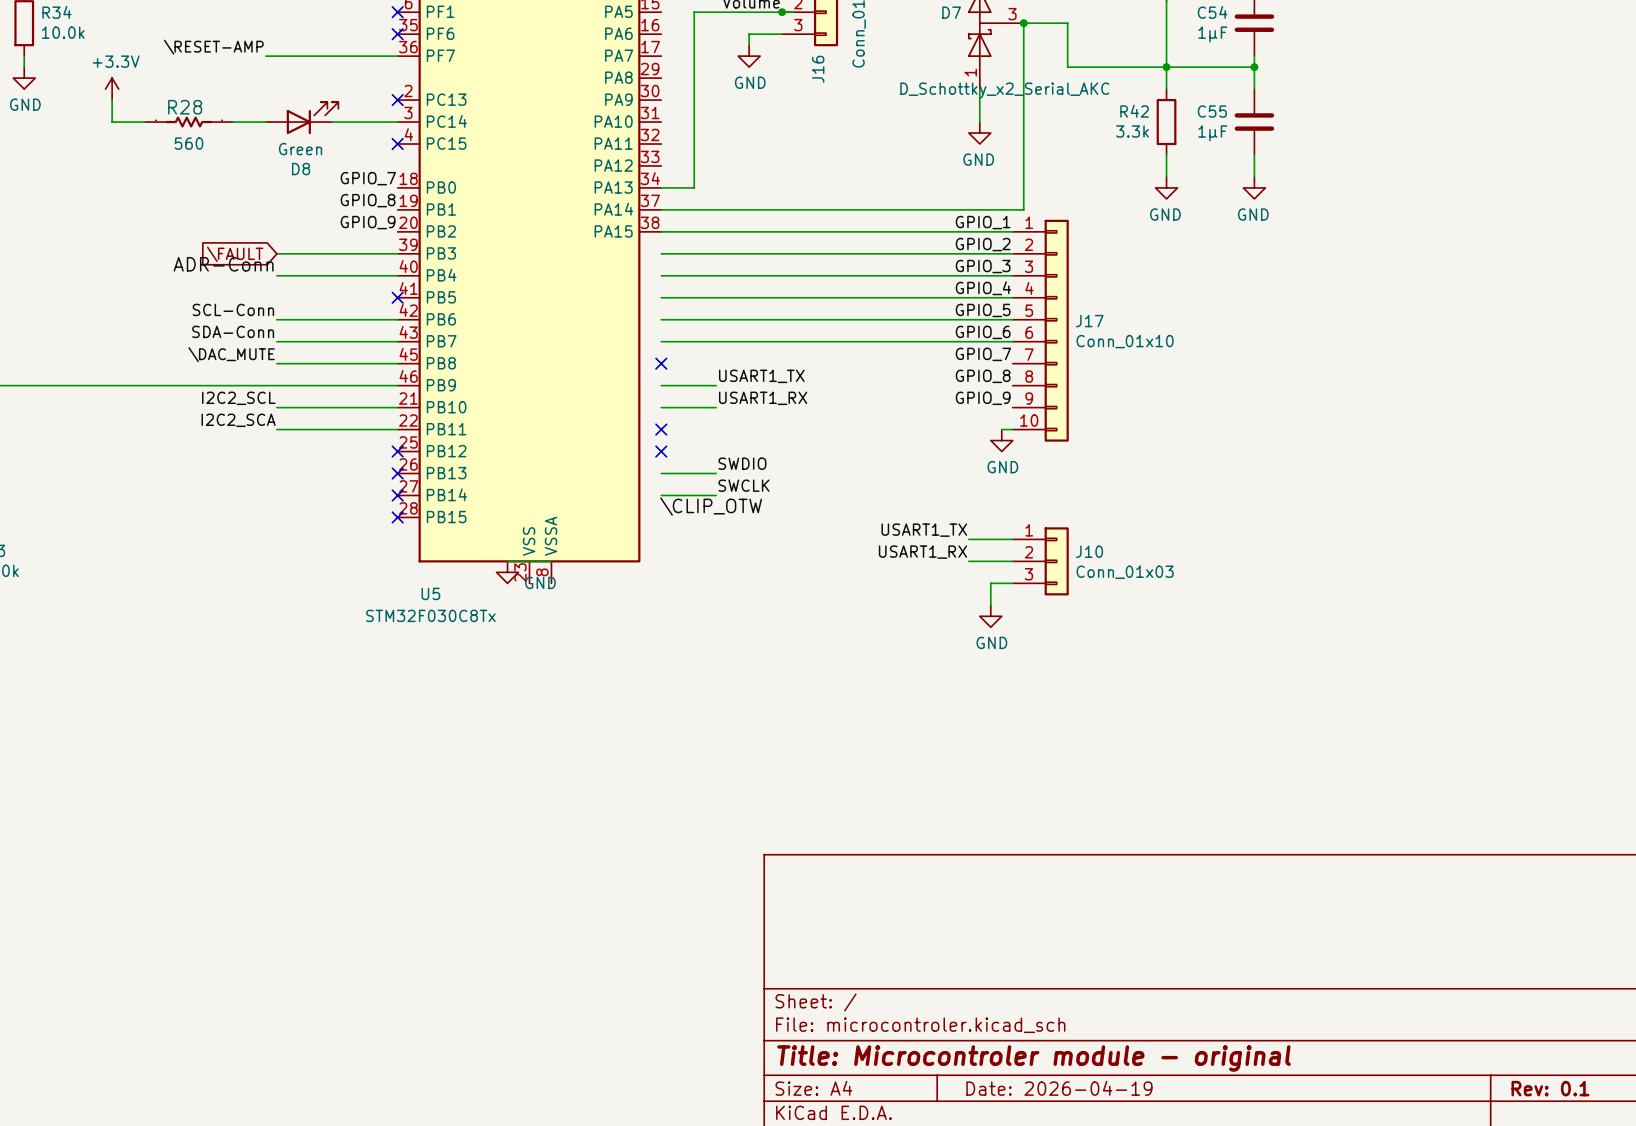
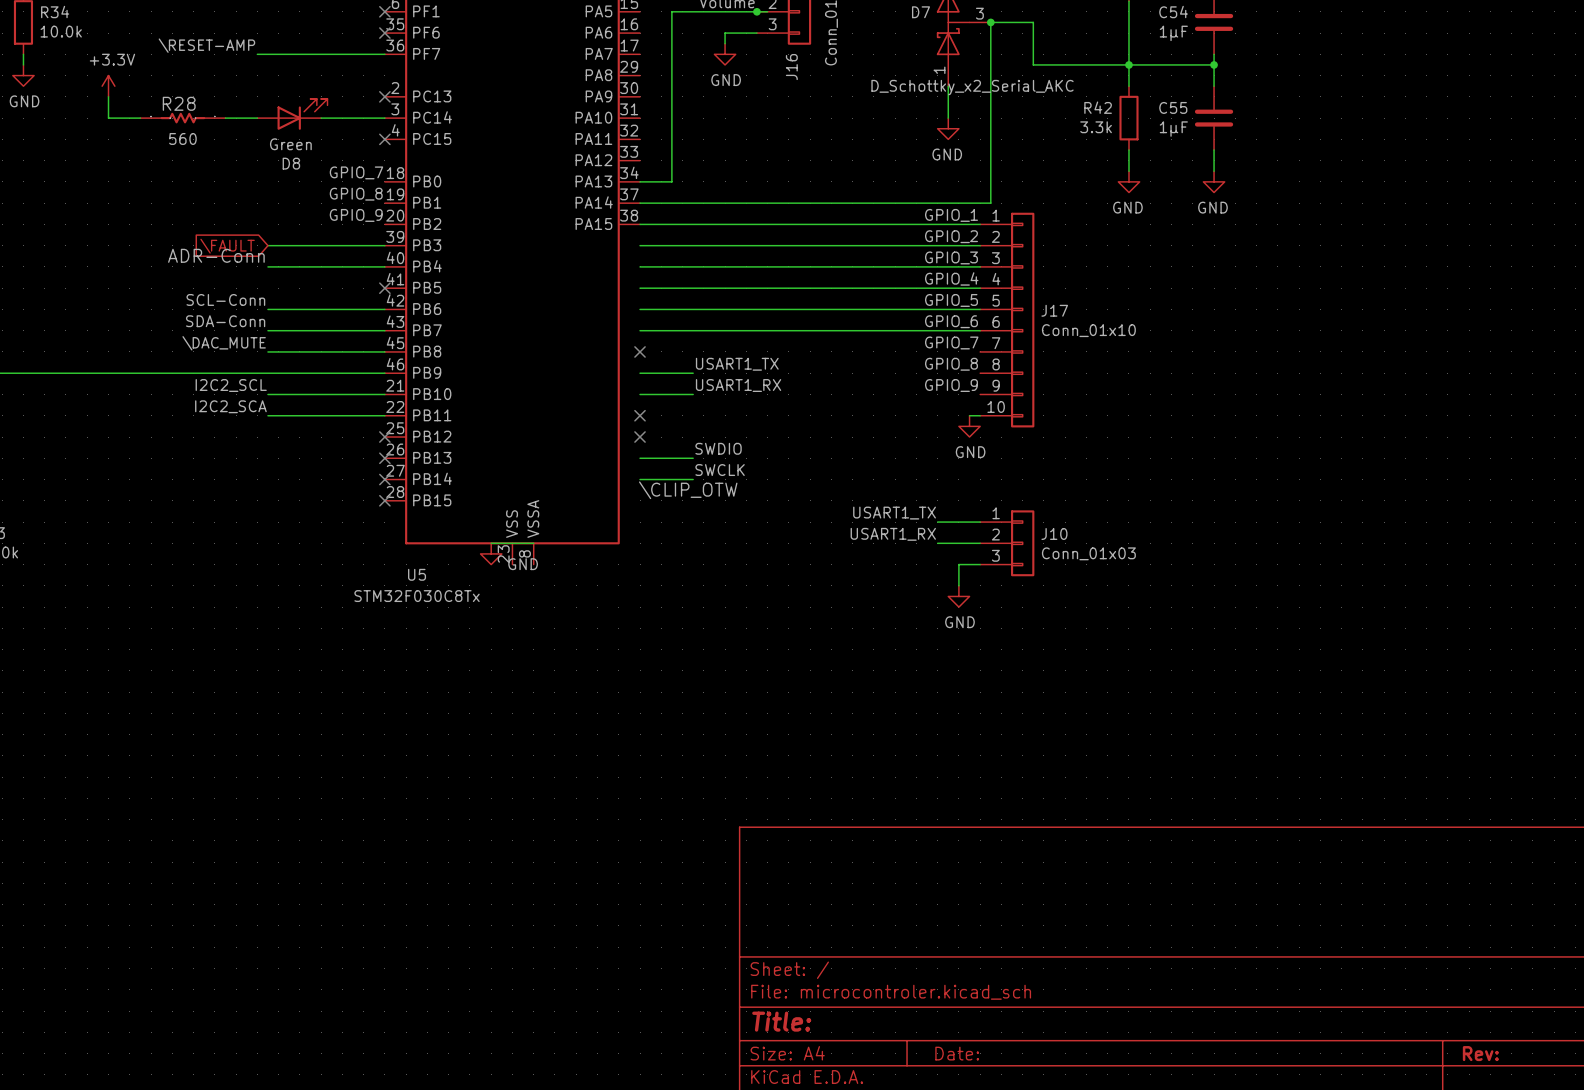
title block: Title: Microcontroler module - original (1034, 1058) -> Title: (781, 1021)
title block: Date: 2026-04-19 (1059, 1088) -> Date: (957, 1053)
title block: Rev: 0.1 (1550, 1088) -> Rev: (1480, 1053)

